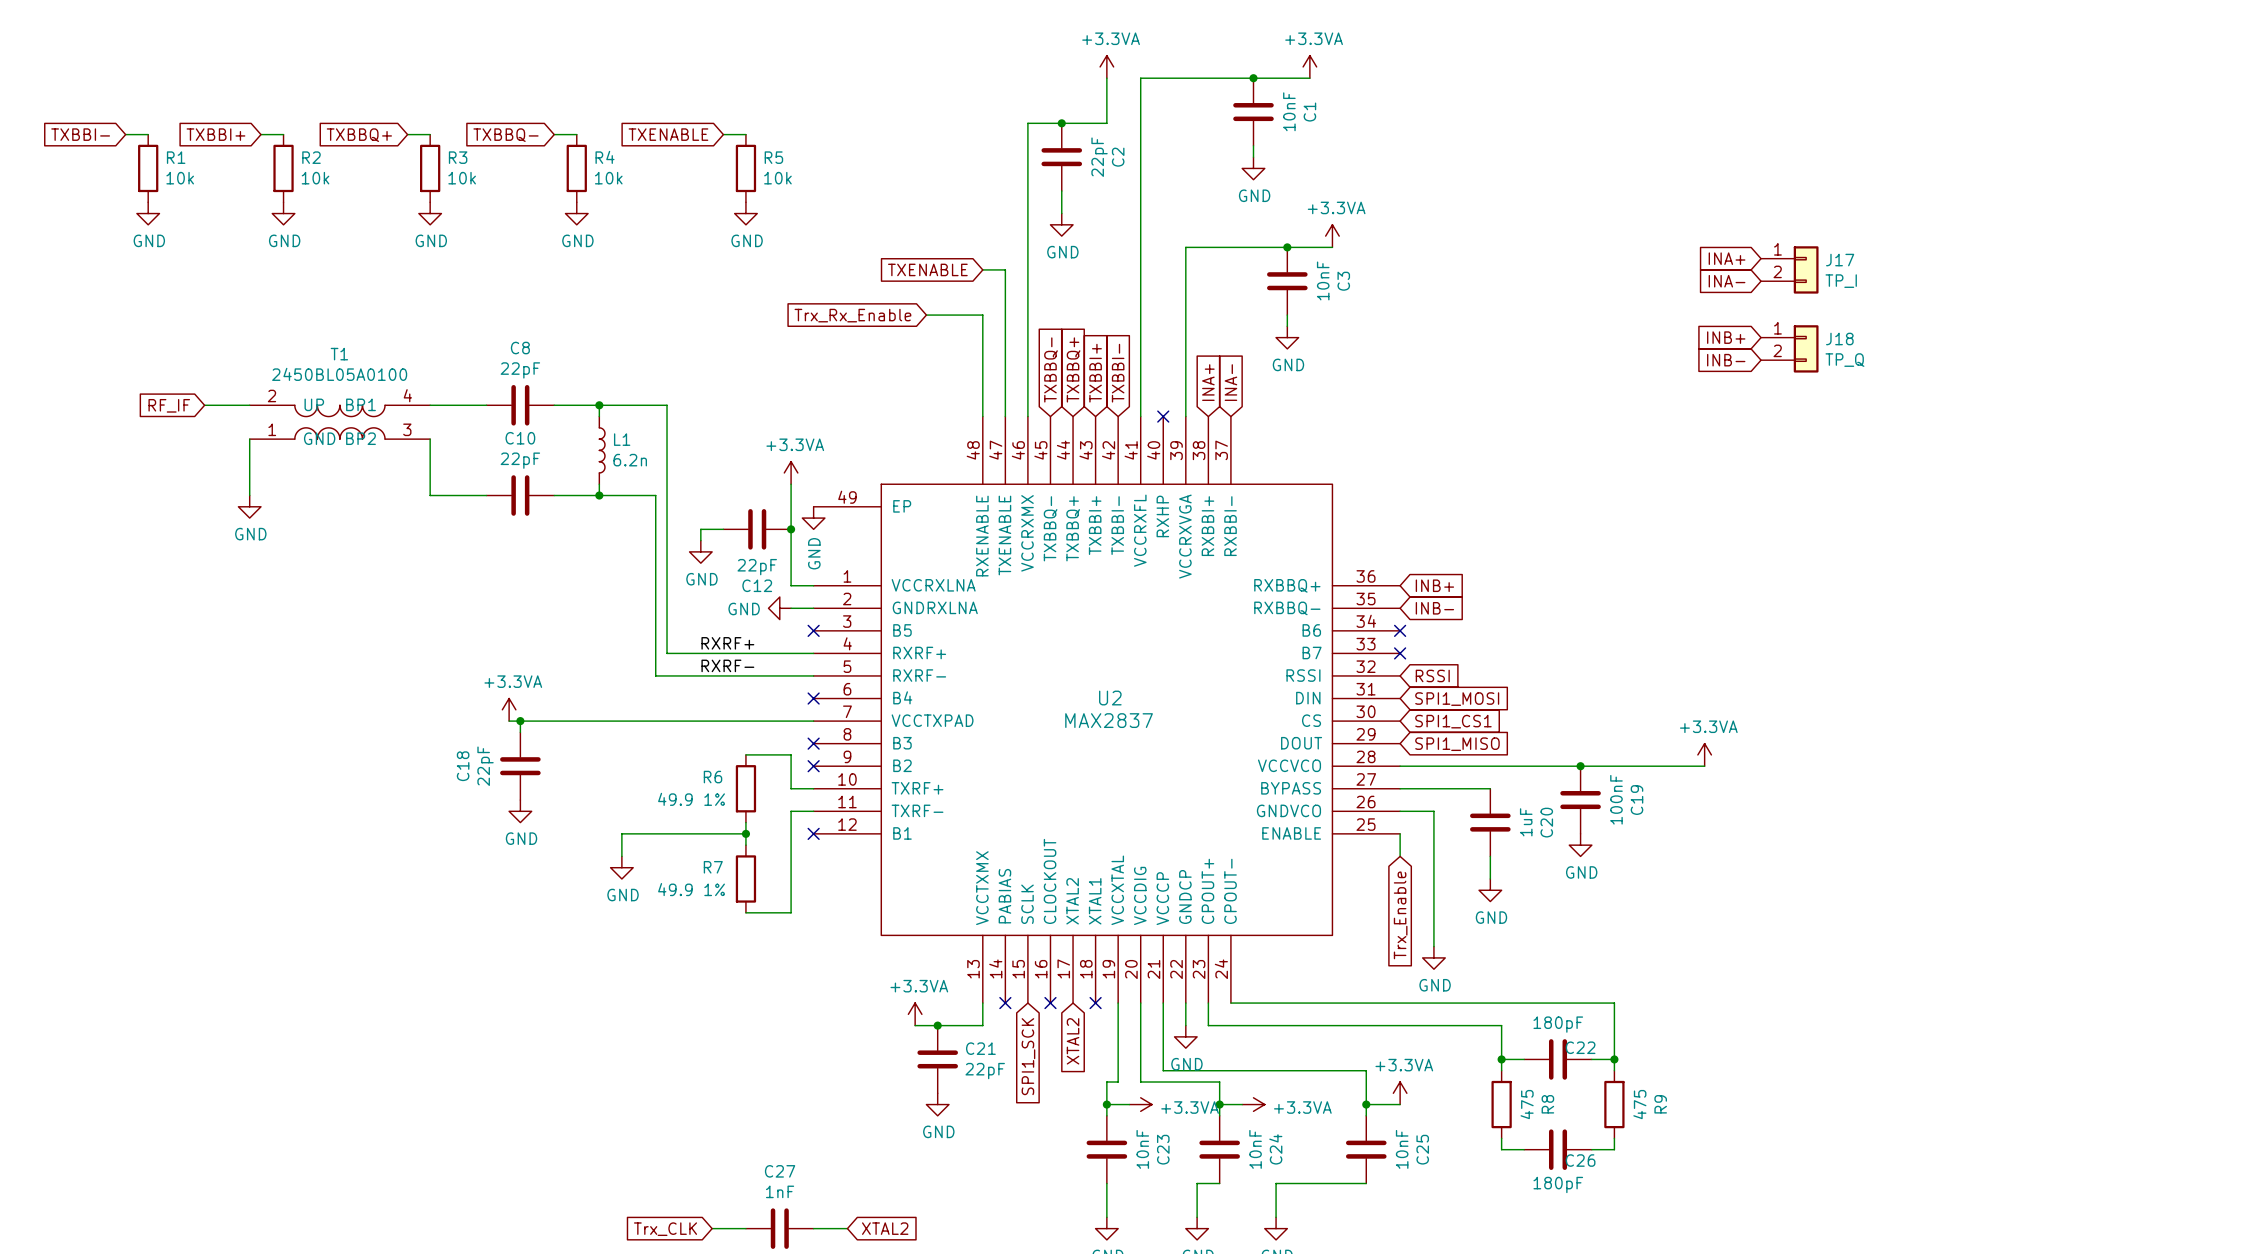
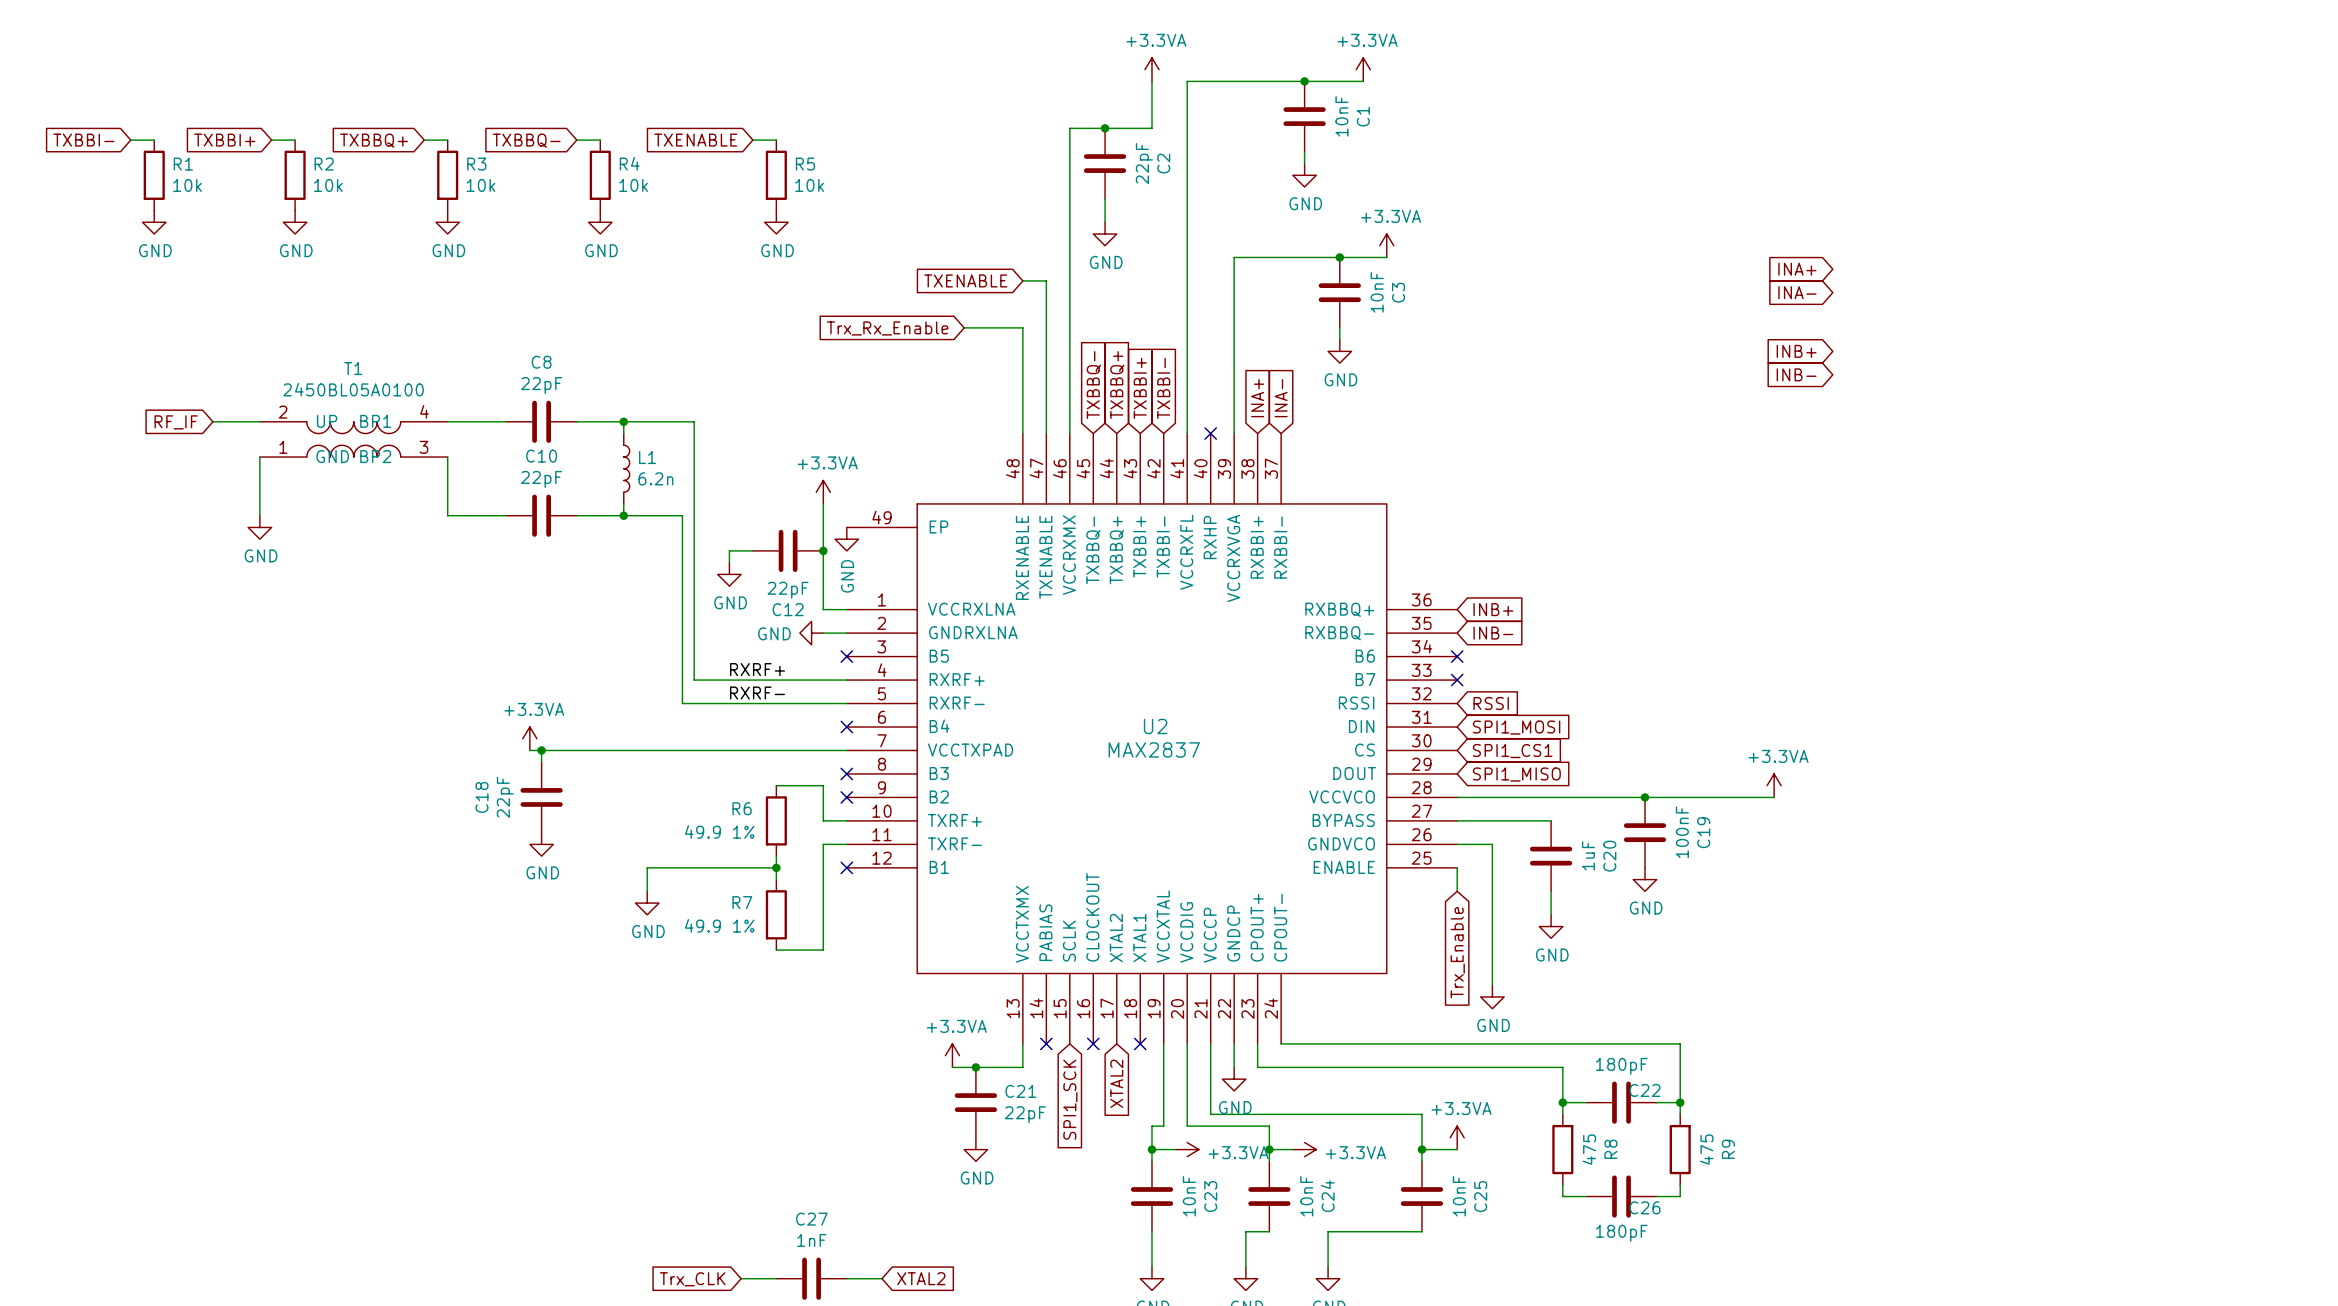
J17: TP_I (1789, 269) -> none
J18: TP_Q (1789, 348) -> none

